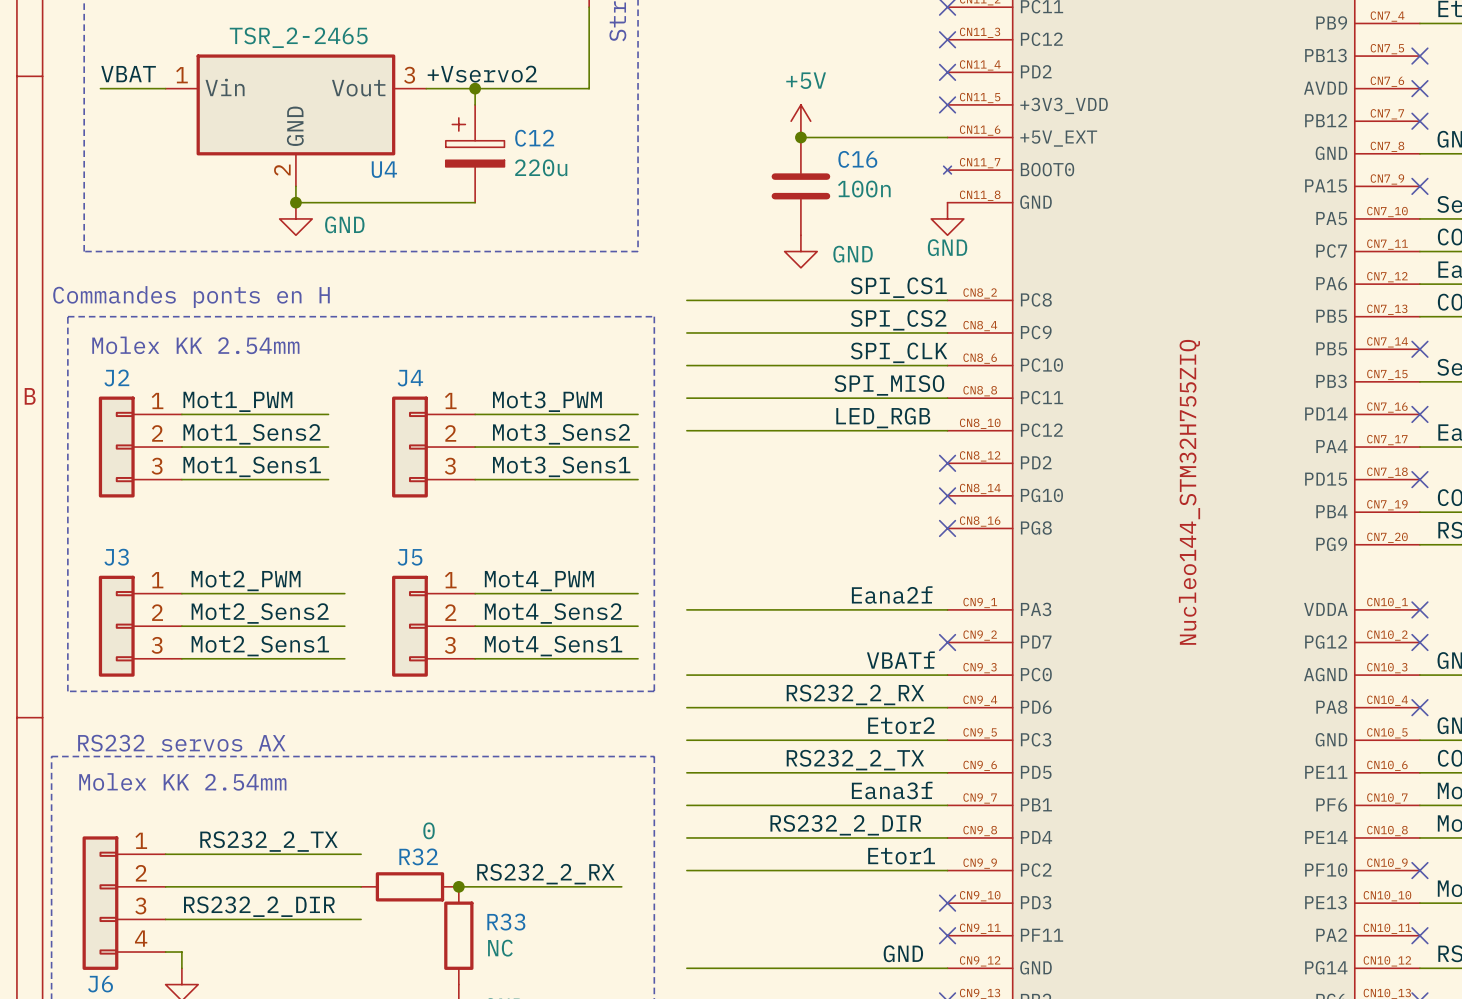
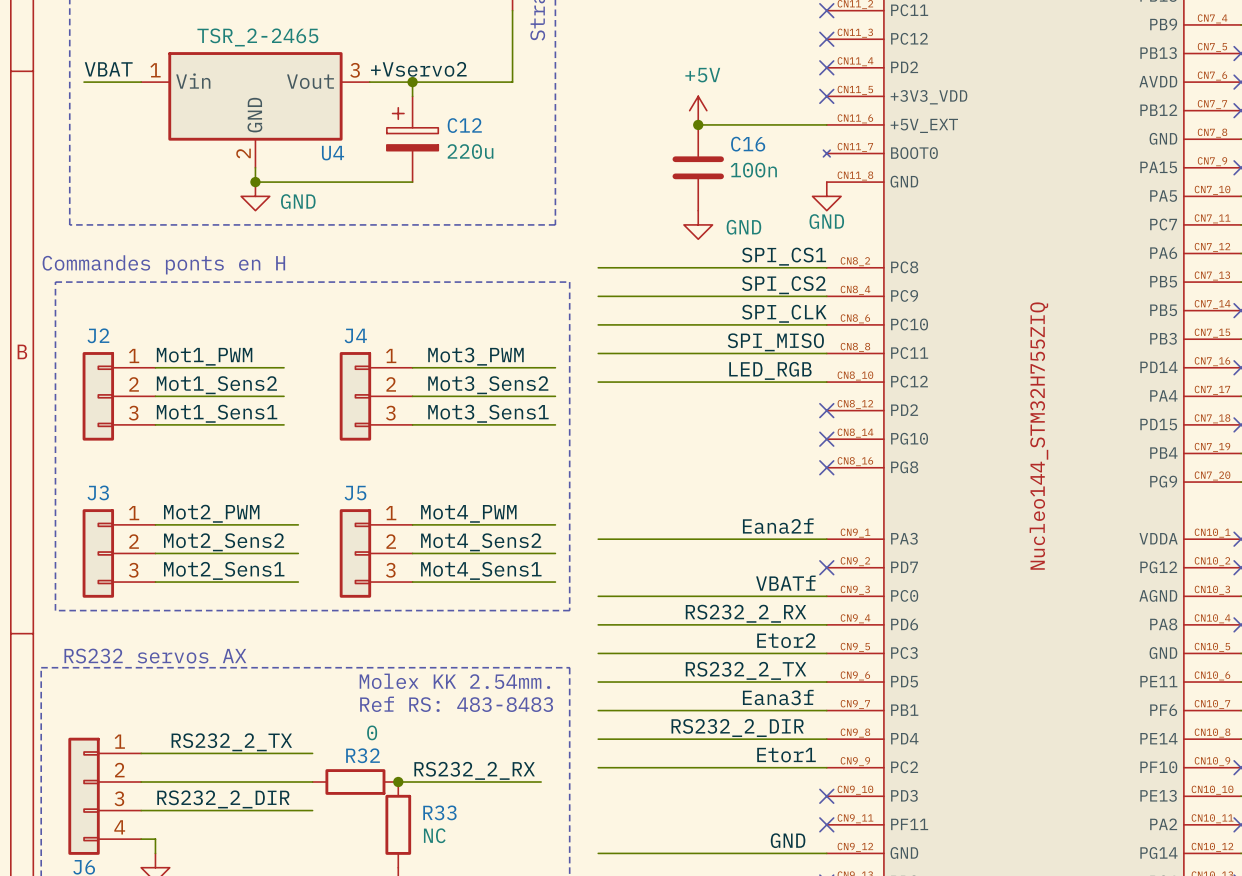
text: Molex KK 2.54mm (195, 345) -> none
text: none -> Molex KK 2.54mm. (454, 681)
text: Molex KK 2.54mm (182, 781) -> none
text: none -> Ref RS: 483-8483 (456, 704)

